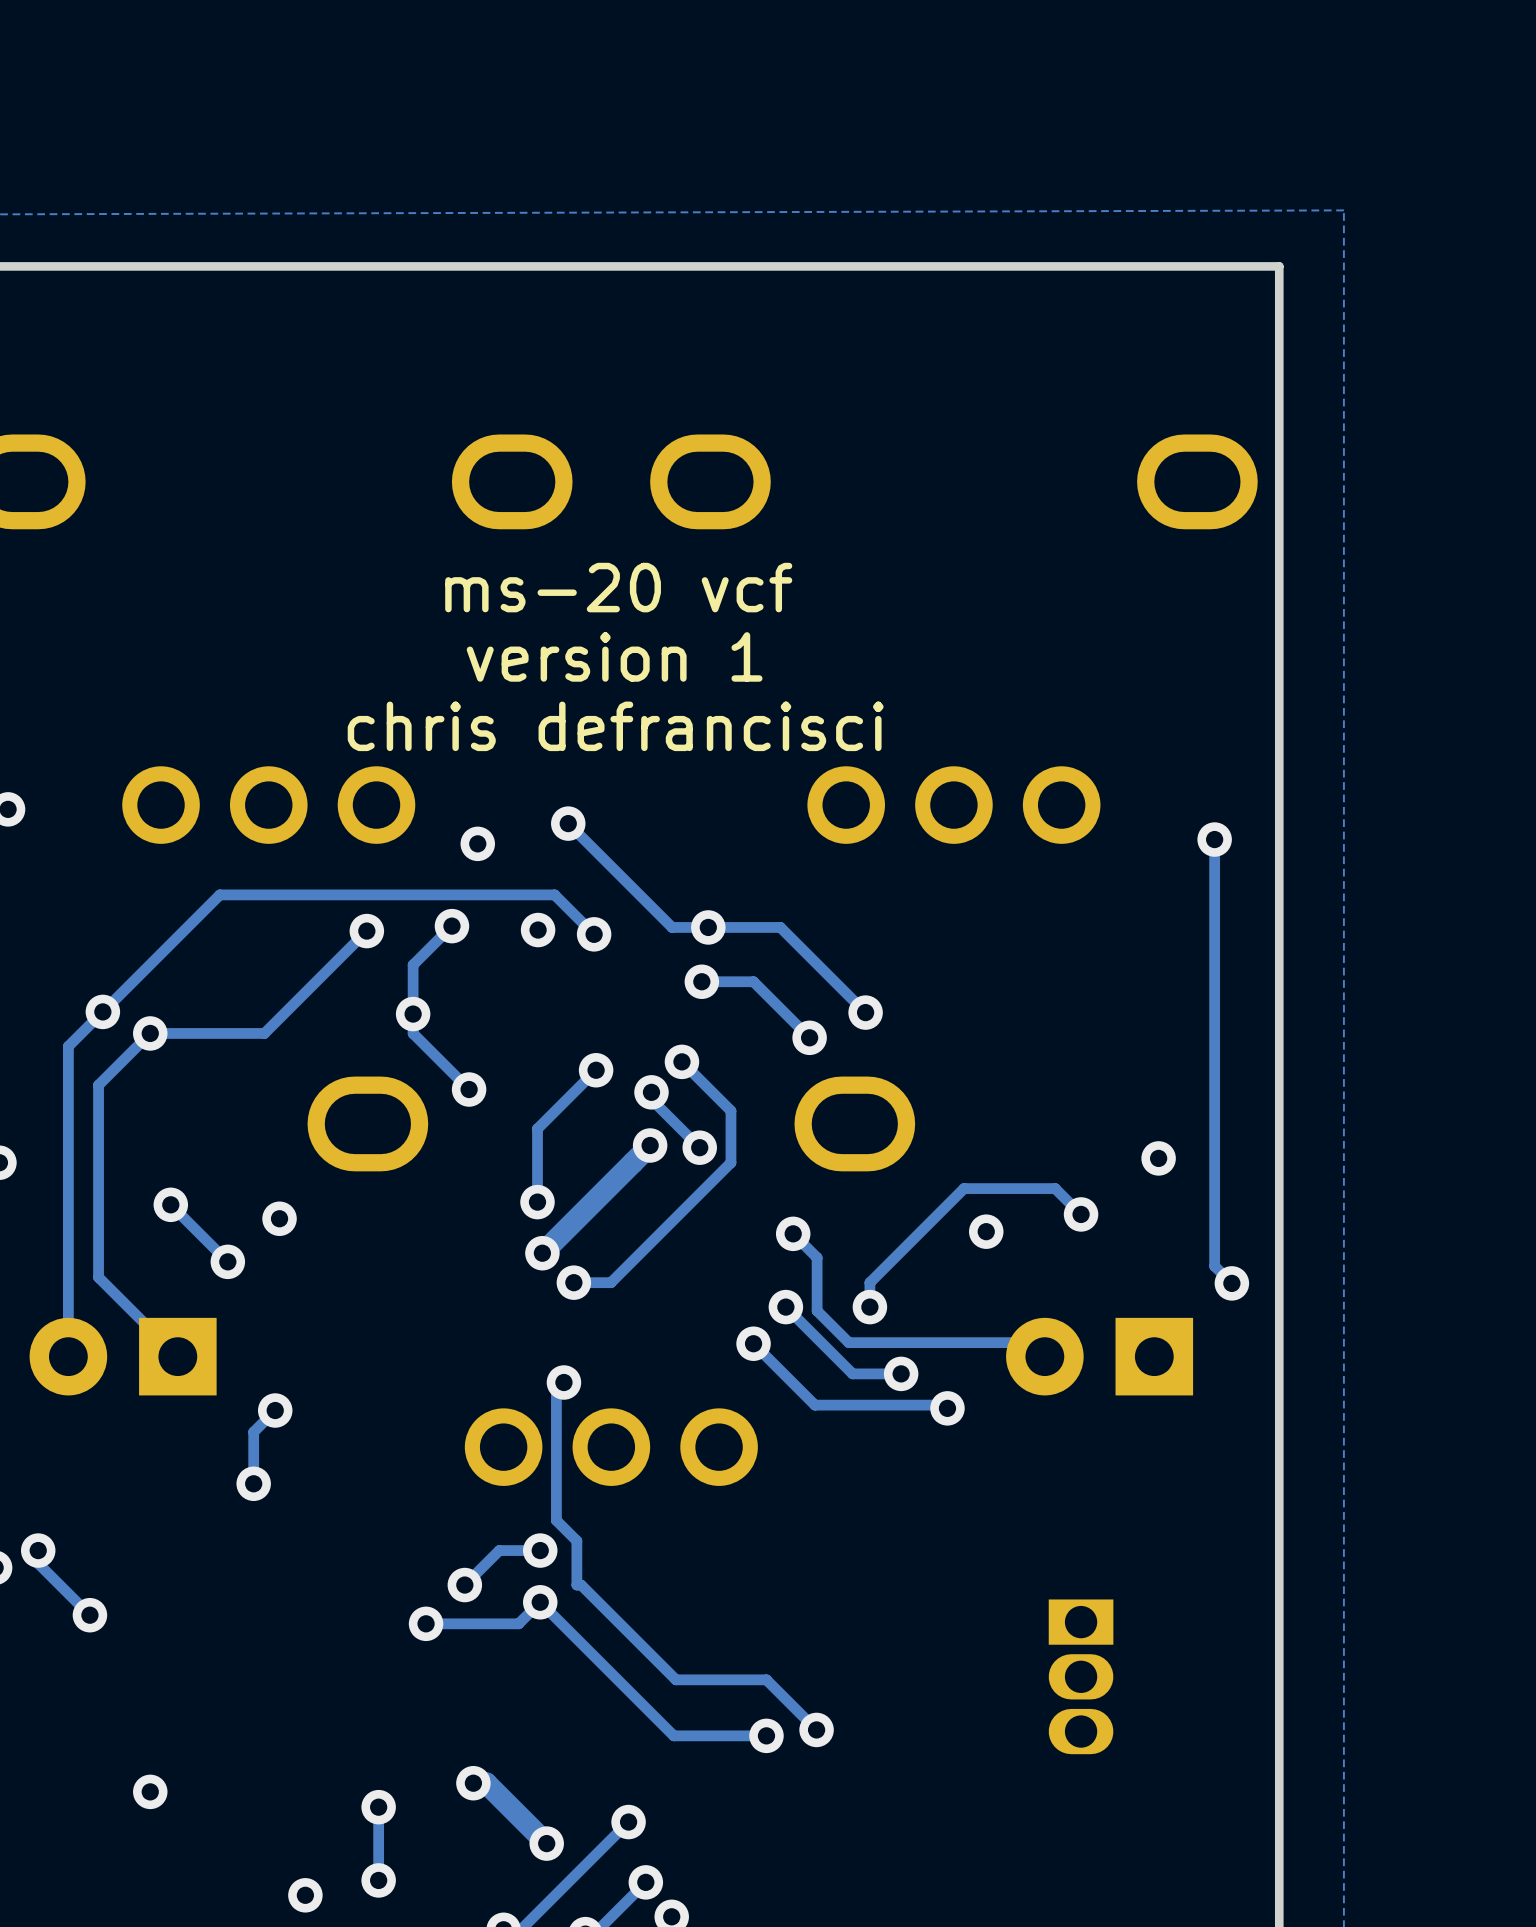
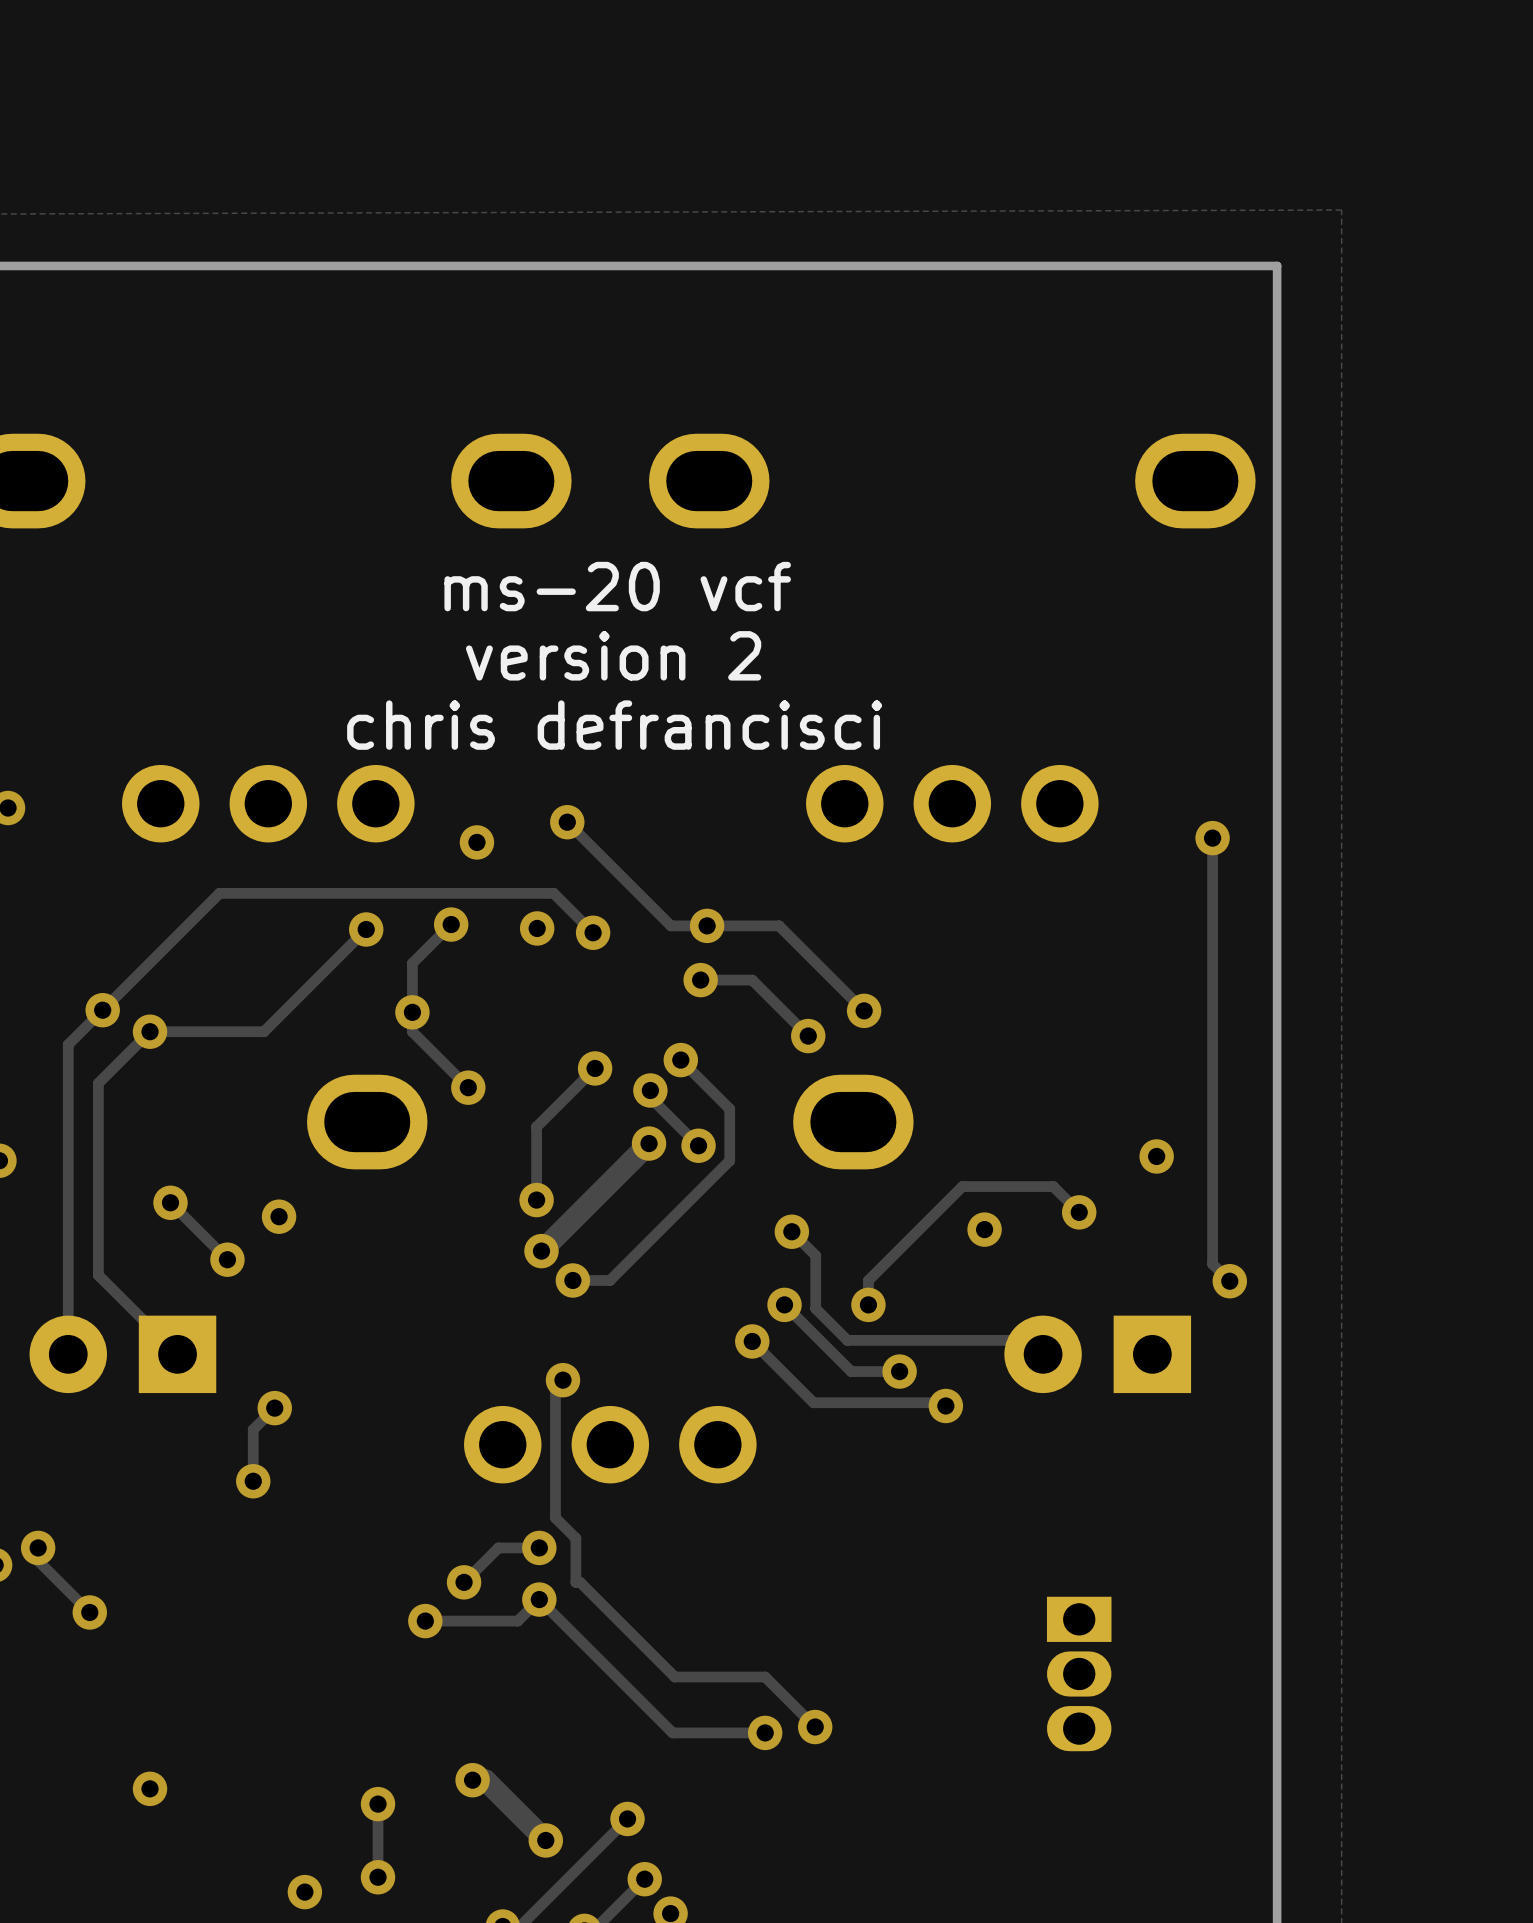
text: version 1 (614, 656) -> version 2 (613, 655)

